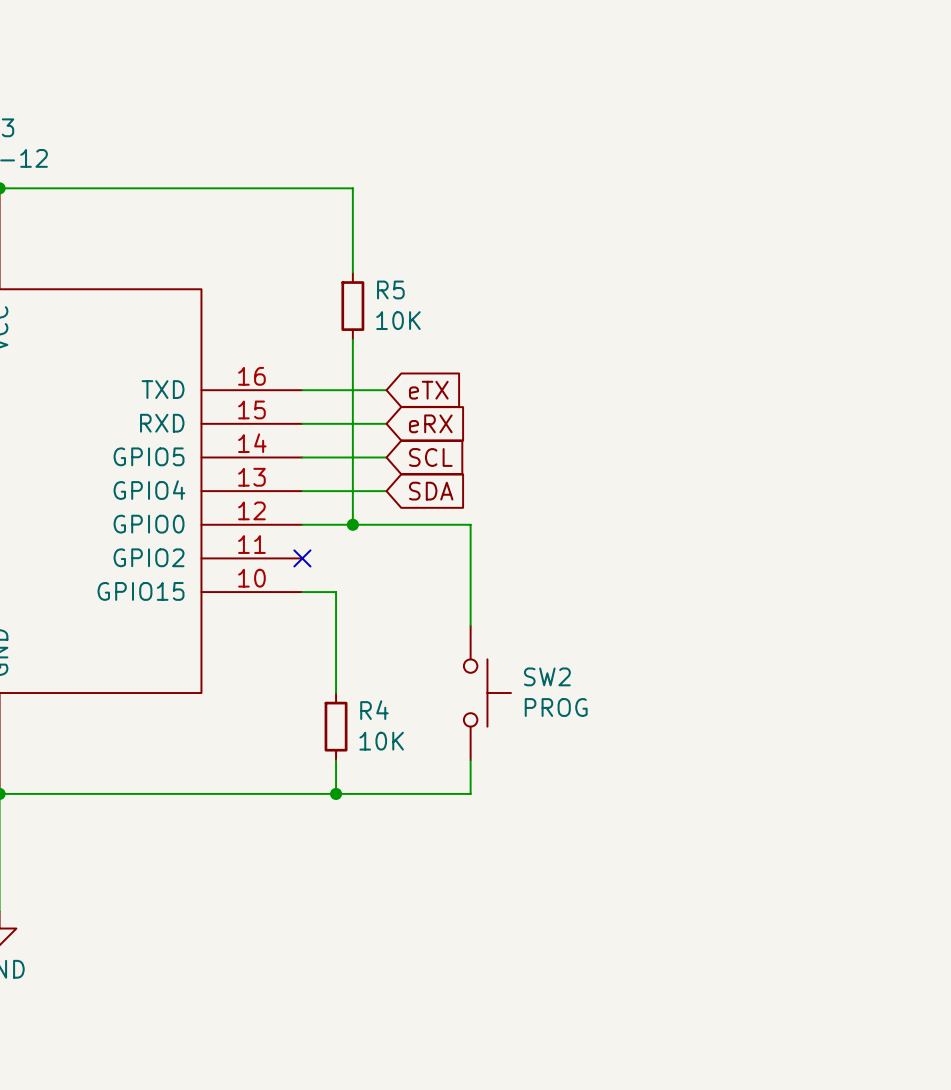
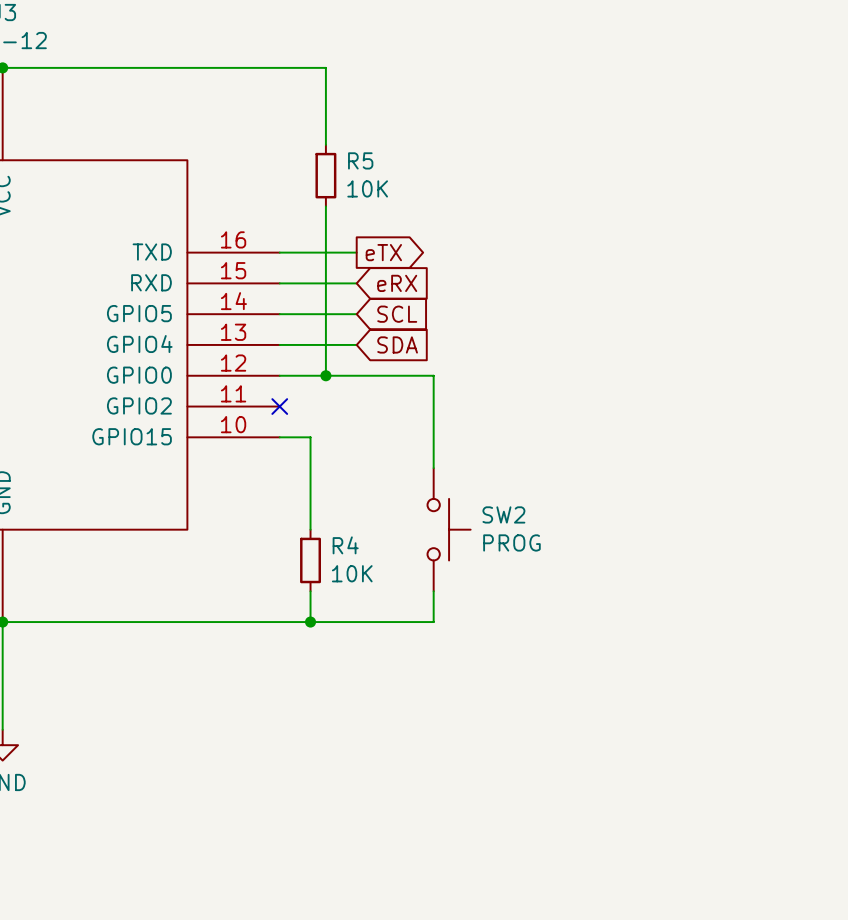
global label shape: input (428, 390) -> output (383, 252)

